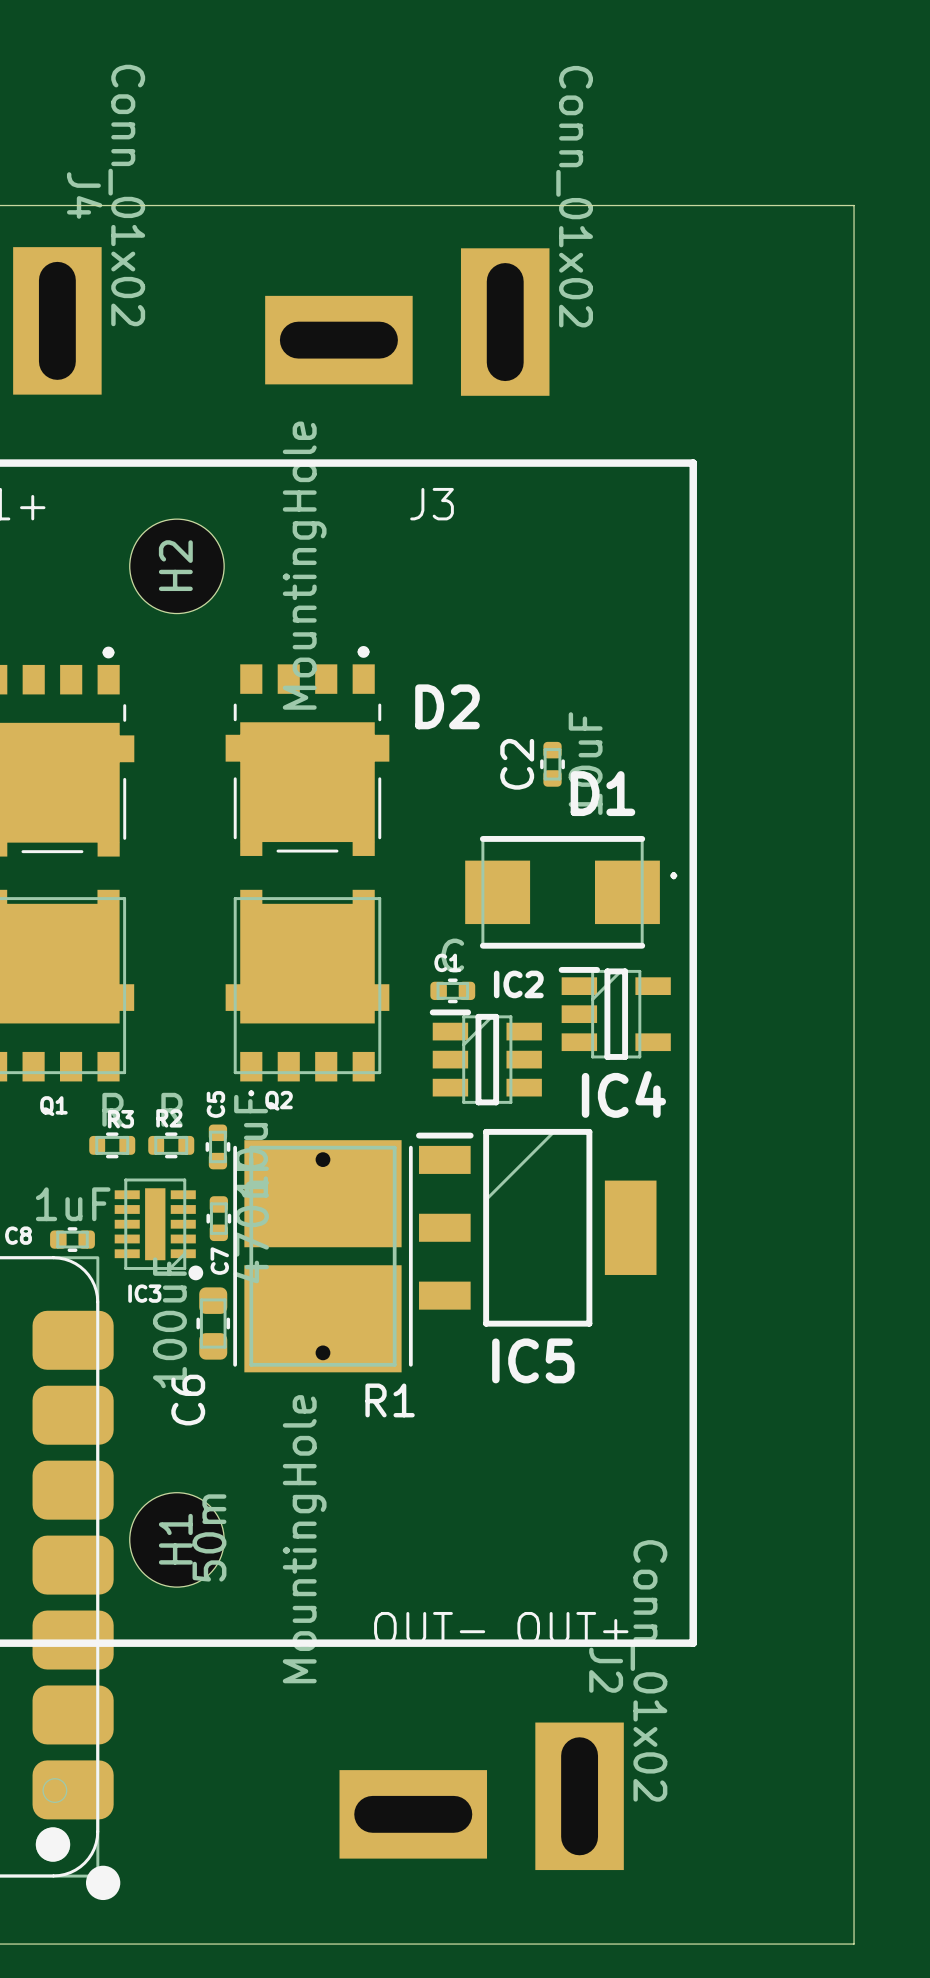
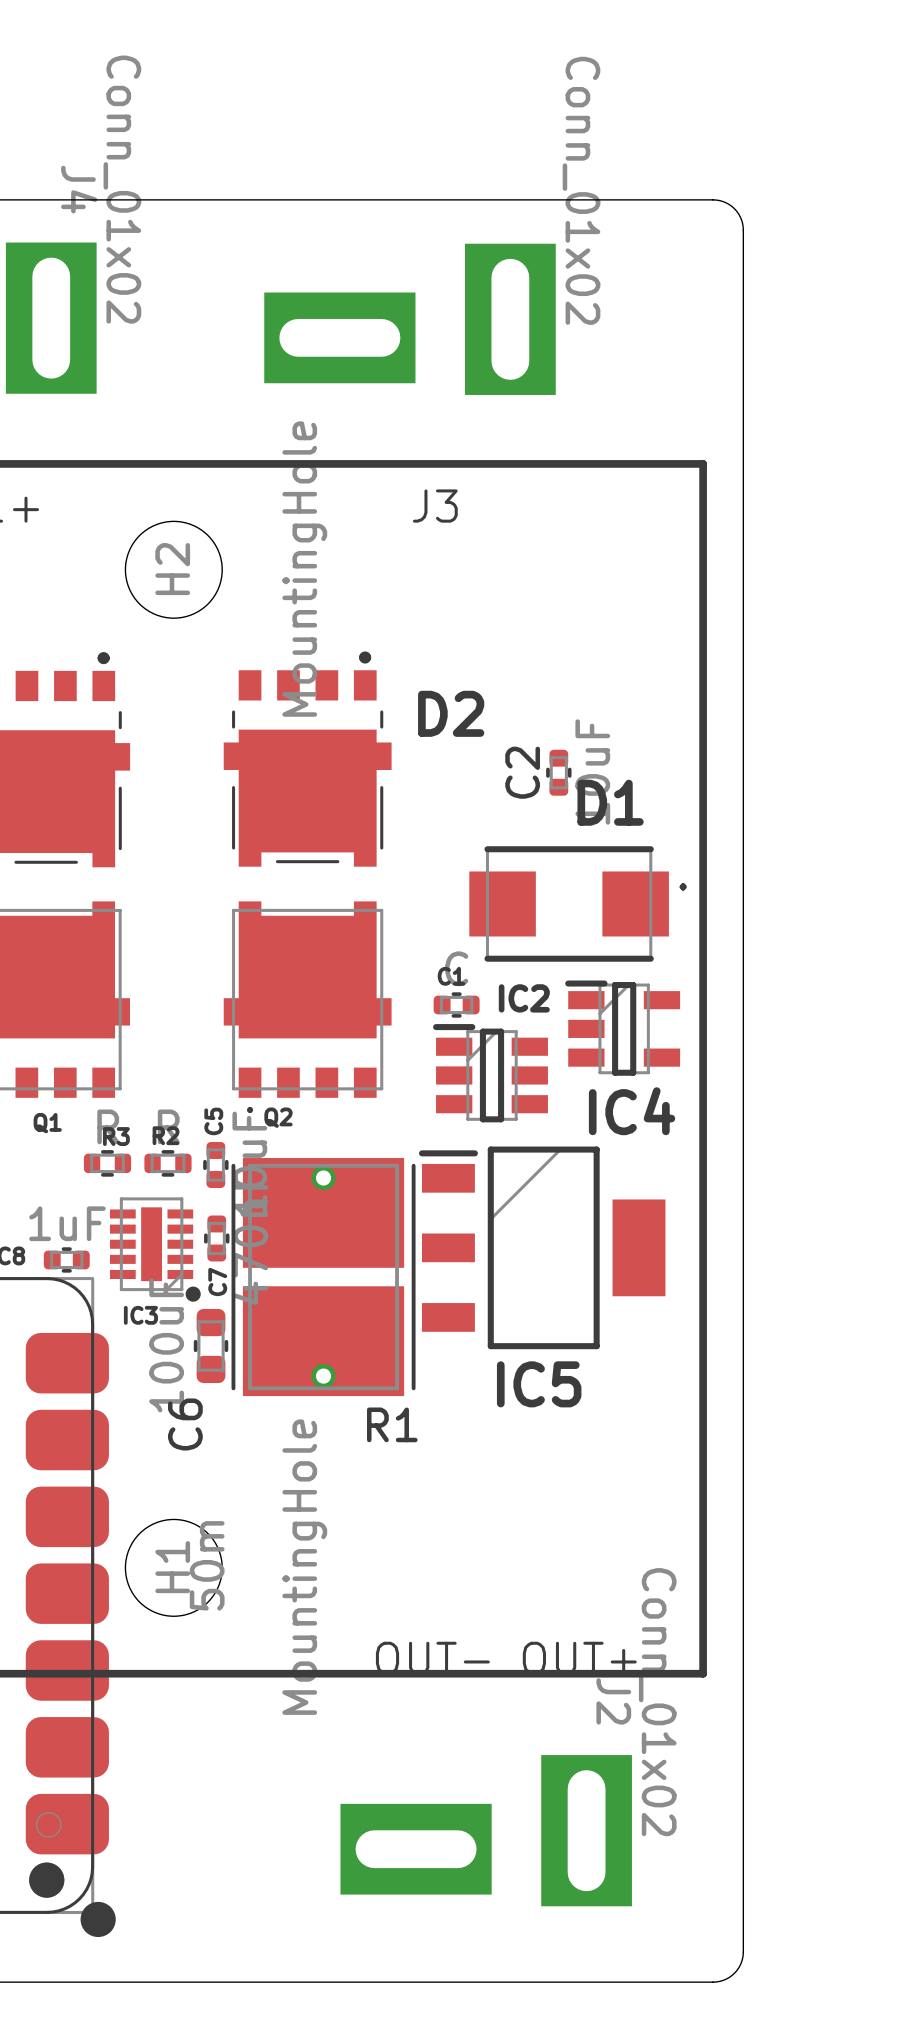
board edge: (702, 205) (854, 205) (854, 1944) (702, 1944) -> (713, 199) (723, 201) (734, 208) (740, 217) (743, 230) (743, 1951) (740, 1965) (734, 1973) (726, 1979) (713, 1982)

